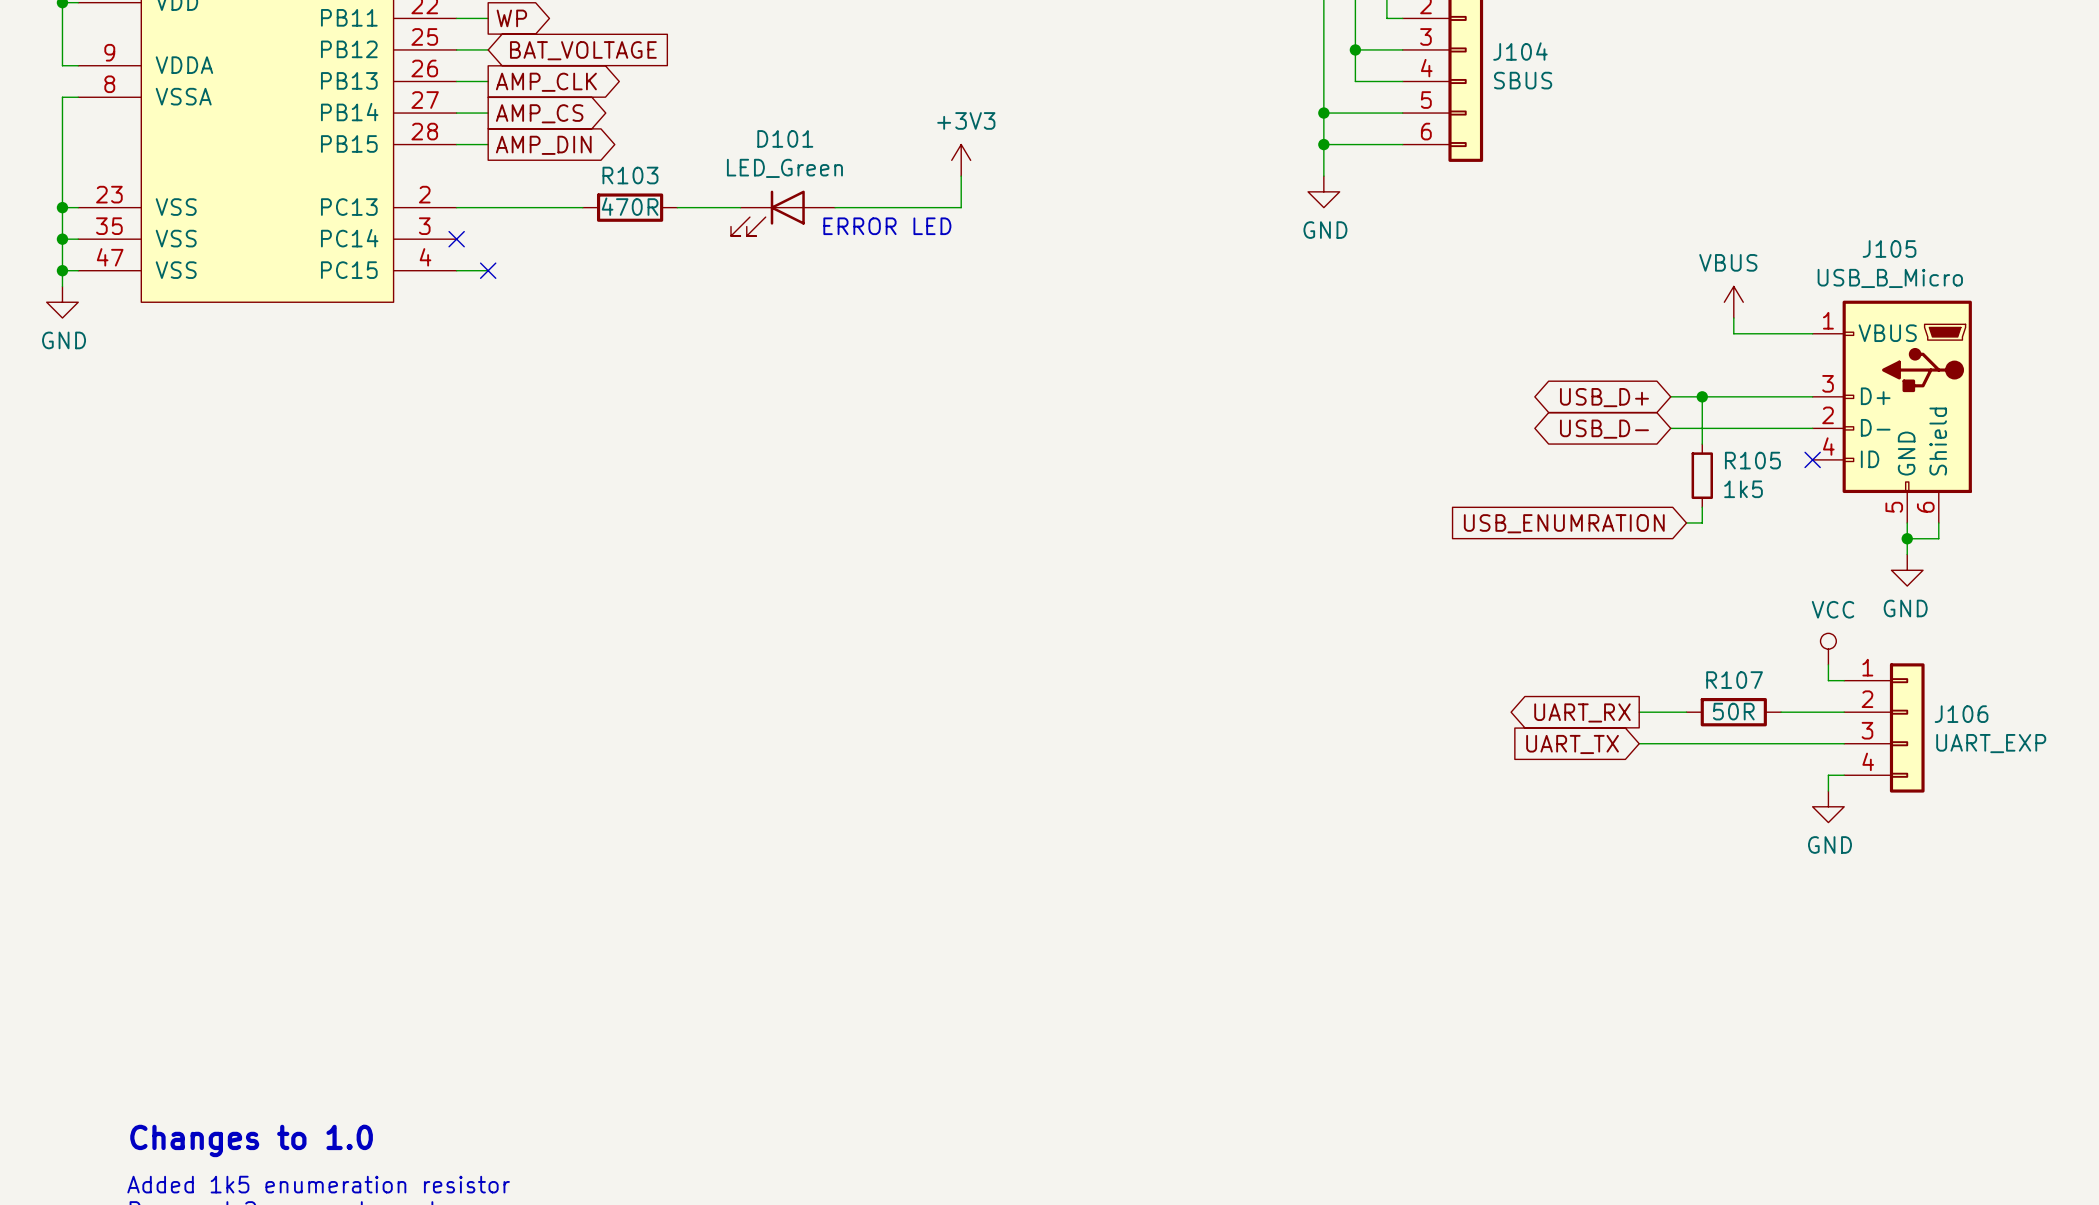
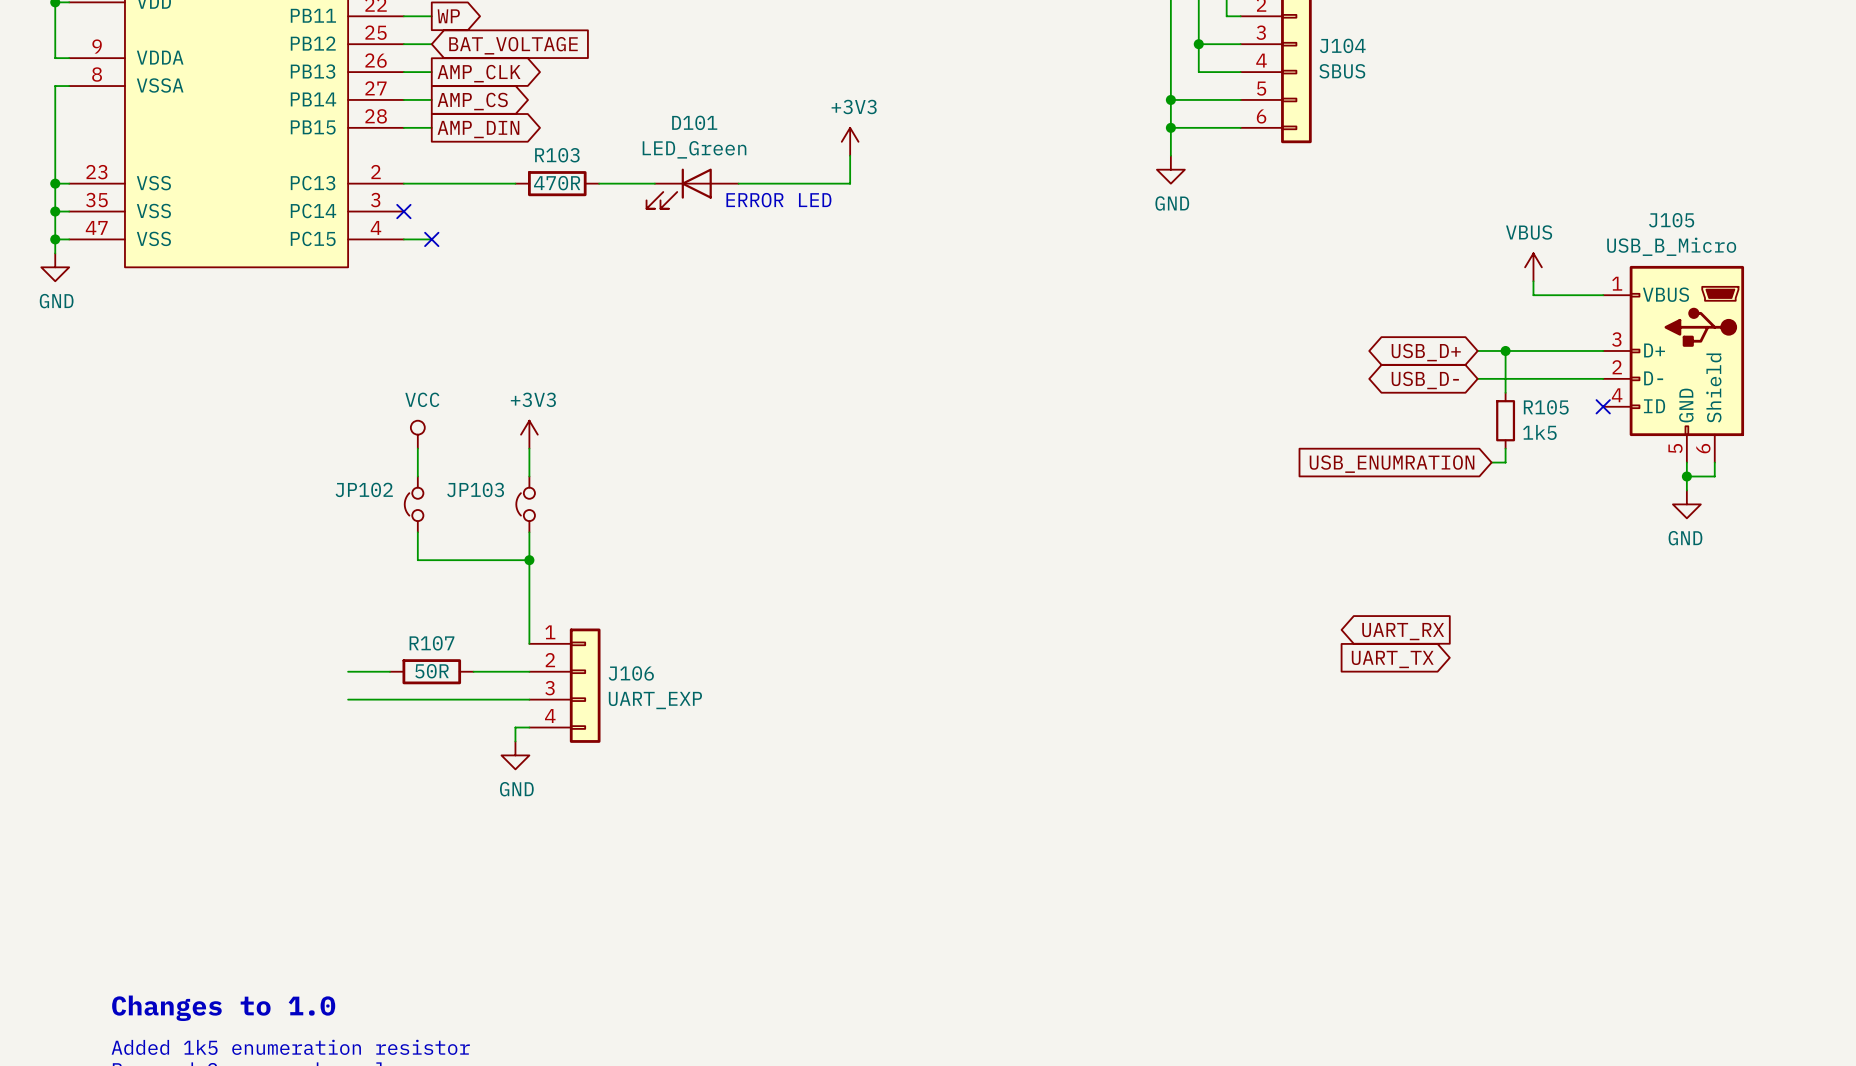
power symbol: none -> VCC (417, 434)
power symbol: none -> +3V3 (529, 434)
wire: none -> (417, 448) (417, 476)
wire: none -> (529, 448) (529, 476)
JP102: none -> (414, 504)
JP103: none -> (525, 504)
wire: none -> (417, 532) (417, 560) (529, 560)
wire: none -> (529, 532) (529, 643)
junction: none -> (529, 560)
power symbol: VCC (1828, 649) -> none
wire: (1828, 664) (1828, 680) (1844, 680) -> none
wire: (1639, 712) (1686, 712) -> none
R107 position: (1733, 712) -> (431, 671)
wire: (1781, 712) (1844, 712) -> none
J106 position: (1884, 727) -> (564, 685)
wire: (1639, 743) (1844, 743) -> none
wire: none -> (348, 671) (389, 671)
wire: none -> (473, 671) (529, 671)
wire: (1844, 775) (1828, 775) (1828, 791) -> none
wire: none -> (348, 699) (529, 699)
power symbol: GND (1828, 806) -> none
wire: none -> (529, 727) (515, 727) (515, 741)
power symbol: none -> GND (515, 755)

